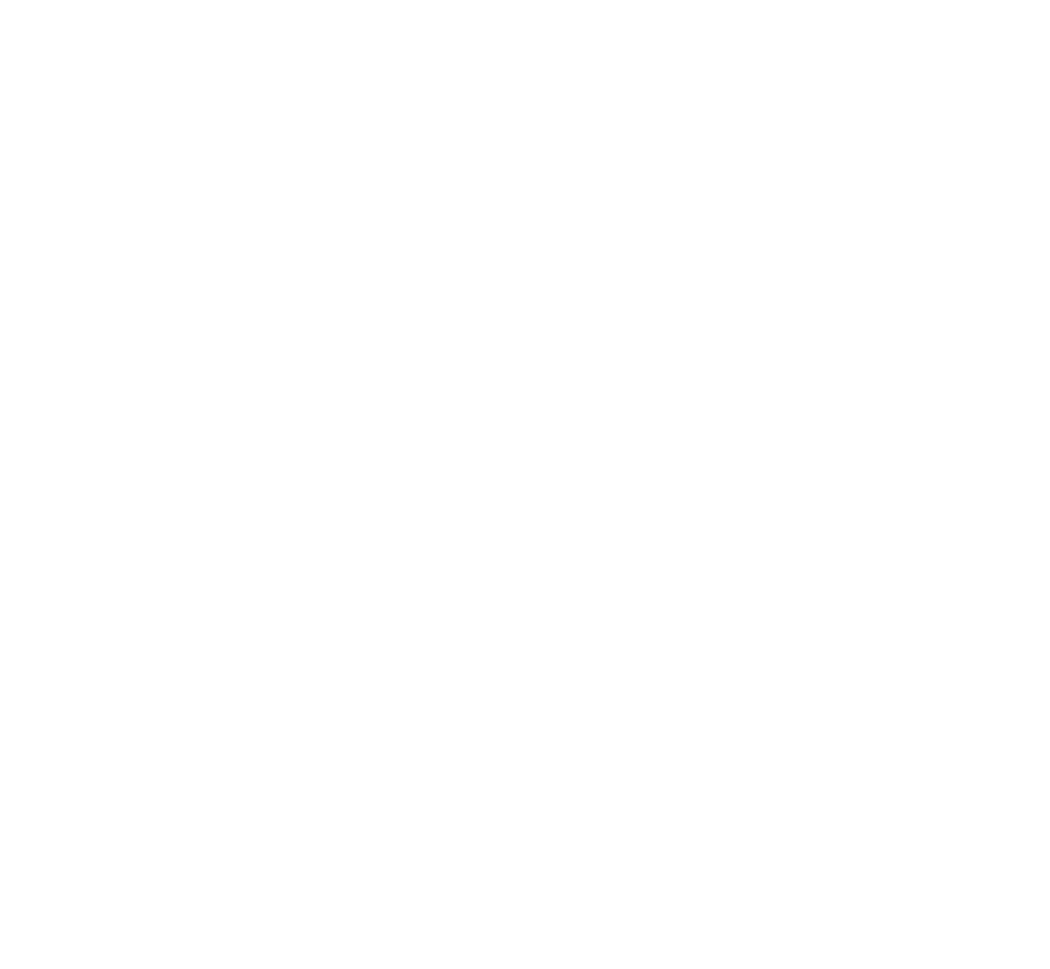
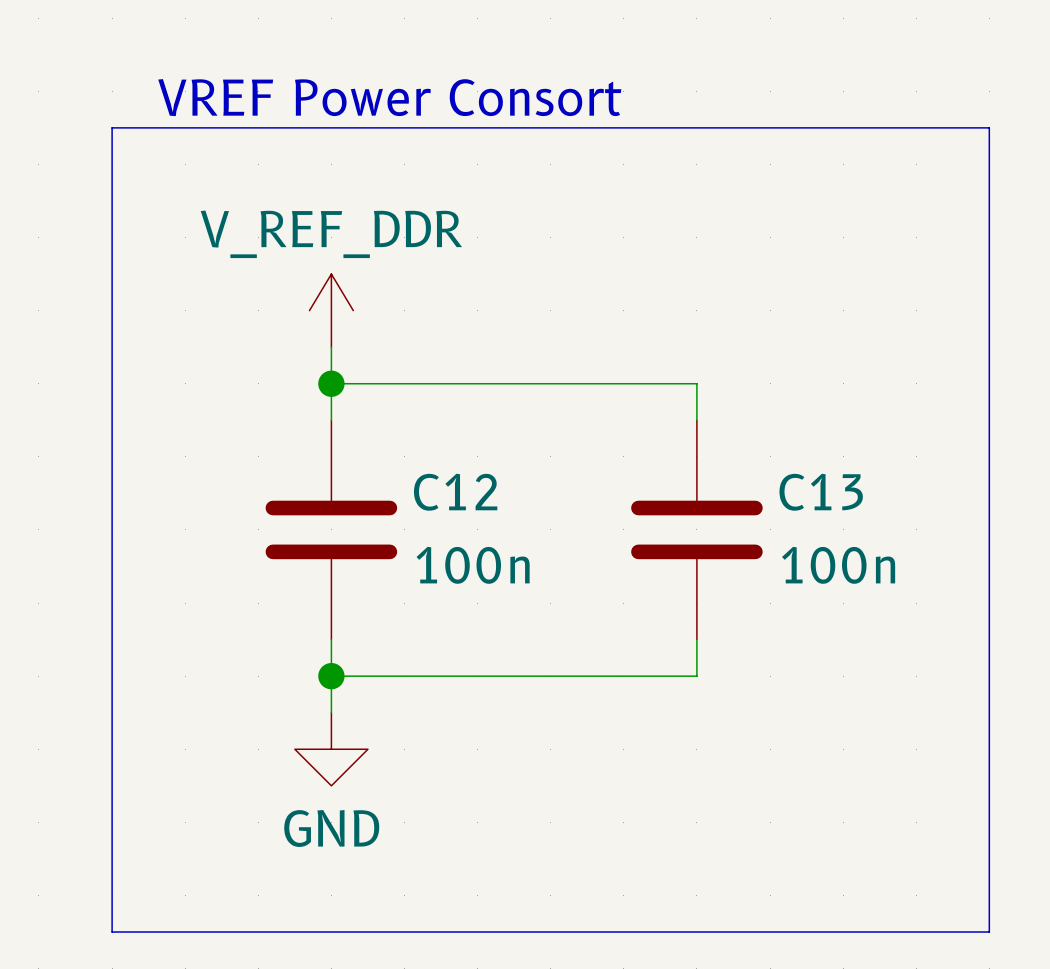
text: none -> VREF Power Consort (389, 97)
line: none -> (112, 127) (989, 127) (989, 932) (112, 932) (112, 127)
power symbol: none -> V_REF_DDR (331, 310)
wire: none -> (331, 347) (331, 420)
wire: none -> (331, 383) (696, 383) (696, 420)
junction: none -> (331, 383)
C12: none -> 100n (331, 529)
C13: none -> 100n (696, 529)
wire: none -> (331, 639) (331, 712)
wire: none -> (696, 639) (696, 676) (331, 676)
junction: none -> (331, 676)
power symbol: none -> GND (331, 749)

